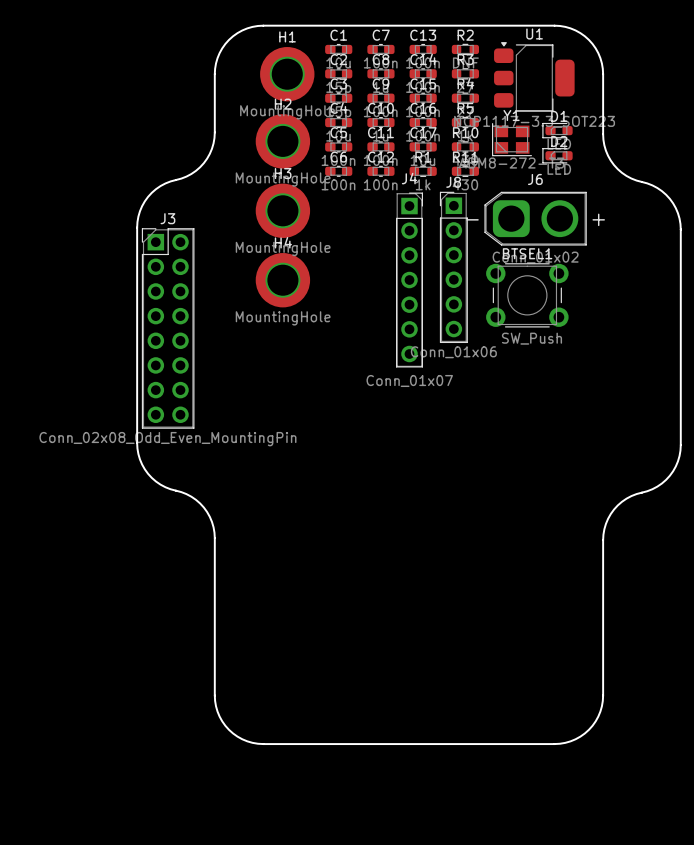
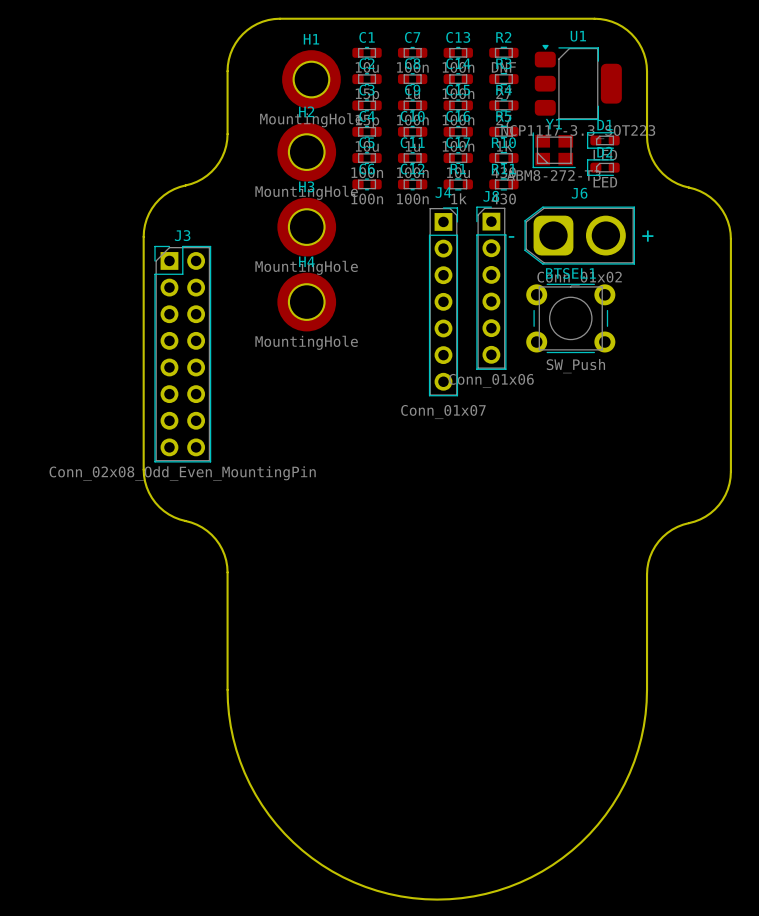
board edge: (263, 25) (554, 25) (575, 30) (592, 43) (601, 63) (603, 139) (610, 160) (626, 175) (652, 185) (661, 191) (675, 208) (680, 229) (679, 456) (675, 466) (666, 479) (652, 489) (631, 496) (621, 501) (610, 513) (605, 523) (603, 540) (602, 700) (595, 721) (584, 733) (575, 739) (554, 744) (257, 743) (247, 741) (233, 733) (219, 716) (214, 695) (214, 538) (211, 521) (207, 512) (195, 499) (186, 494) (165, 487) (151, 477) (142, 464) (137, 448) (137, 222) (142, 206) (151, 192) (165, 183) (191, 174) (207, 158) (214, 137) (215, 68) (219, 53) (229, 39) (237, 33) (252, 26) (263, 25) -> (280, 18) (268, 20) (252, 26) (242, 34) (232, 48) (227, 65) (227, 140) (219, 162) (202, 178) (174, 189) (164, 195) (151, 208) (145, 224) (145, 481) (151, 497) (159, 507) (174, 517) (196, 524) (207, 530) (215, 539) (224, 554) (227, 572) (227, 689) (230, 726) (244, 772) (262, 805) (276, 824) (312, 858) (332, 871) (365, 886) (388, 893) (425, 899) (461, 898) (485, 893) (531, 877) (572, 850) (589, 833) (612, 805) (634, 761) (641, 738) (646, 702) (647, 574) (650, 556) (658, 541) (667, 533) (677, 526) (700, 519) (715, 509) (725, 494) (729, 483) (729, 227) (722, 210) (715, 201) (700, 191) (672, 181) (662, 173) (652, 159) (647, 141) (645, 59) (635, 38) (617, 23) (594, 18) (280, 18)

